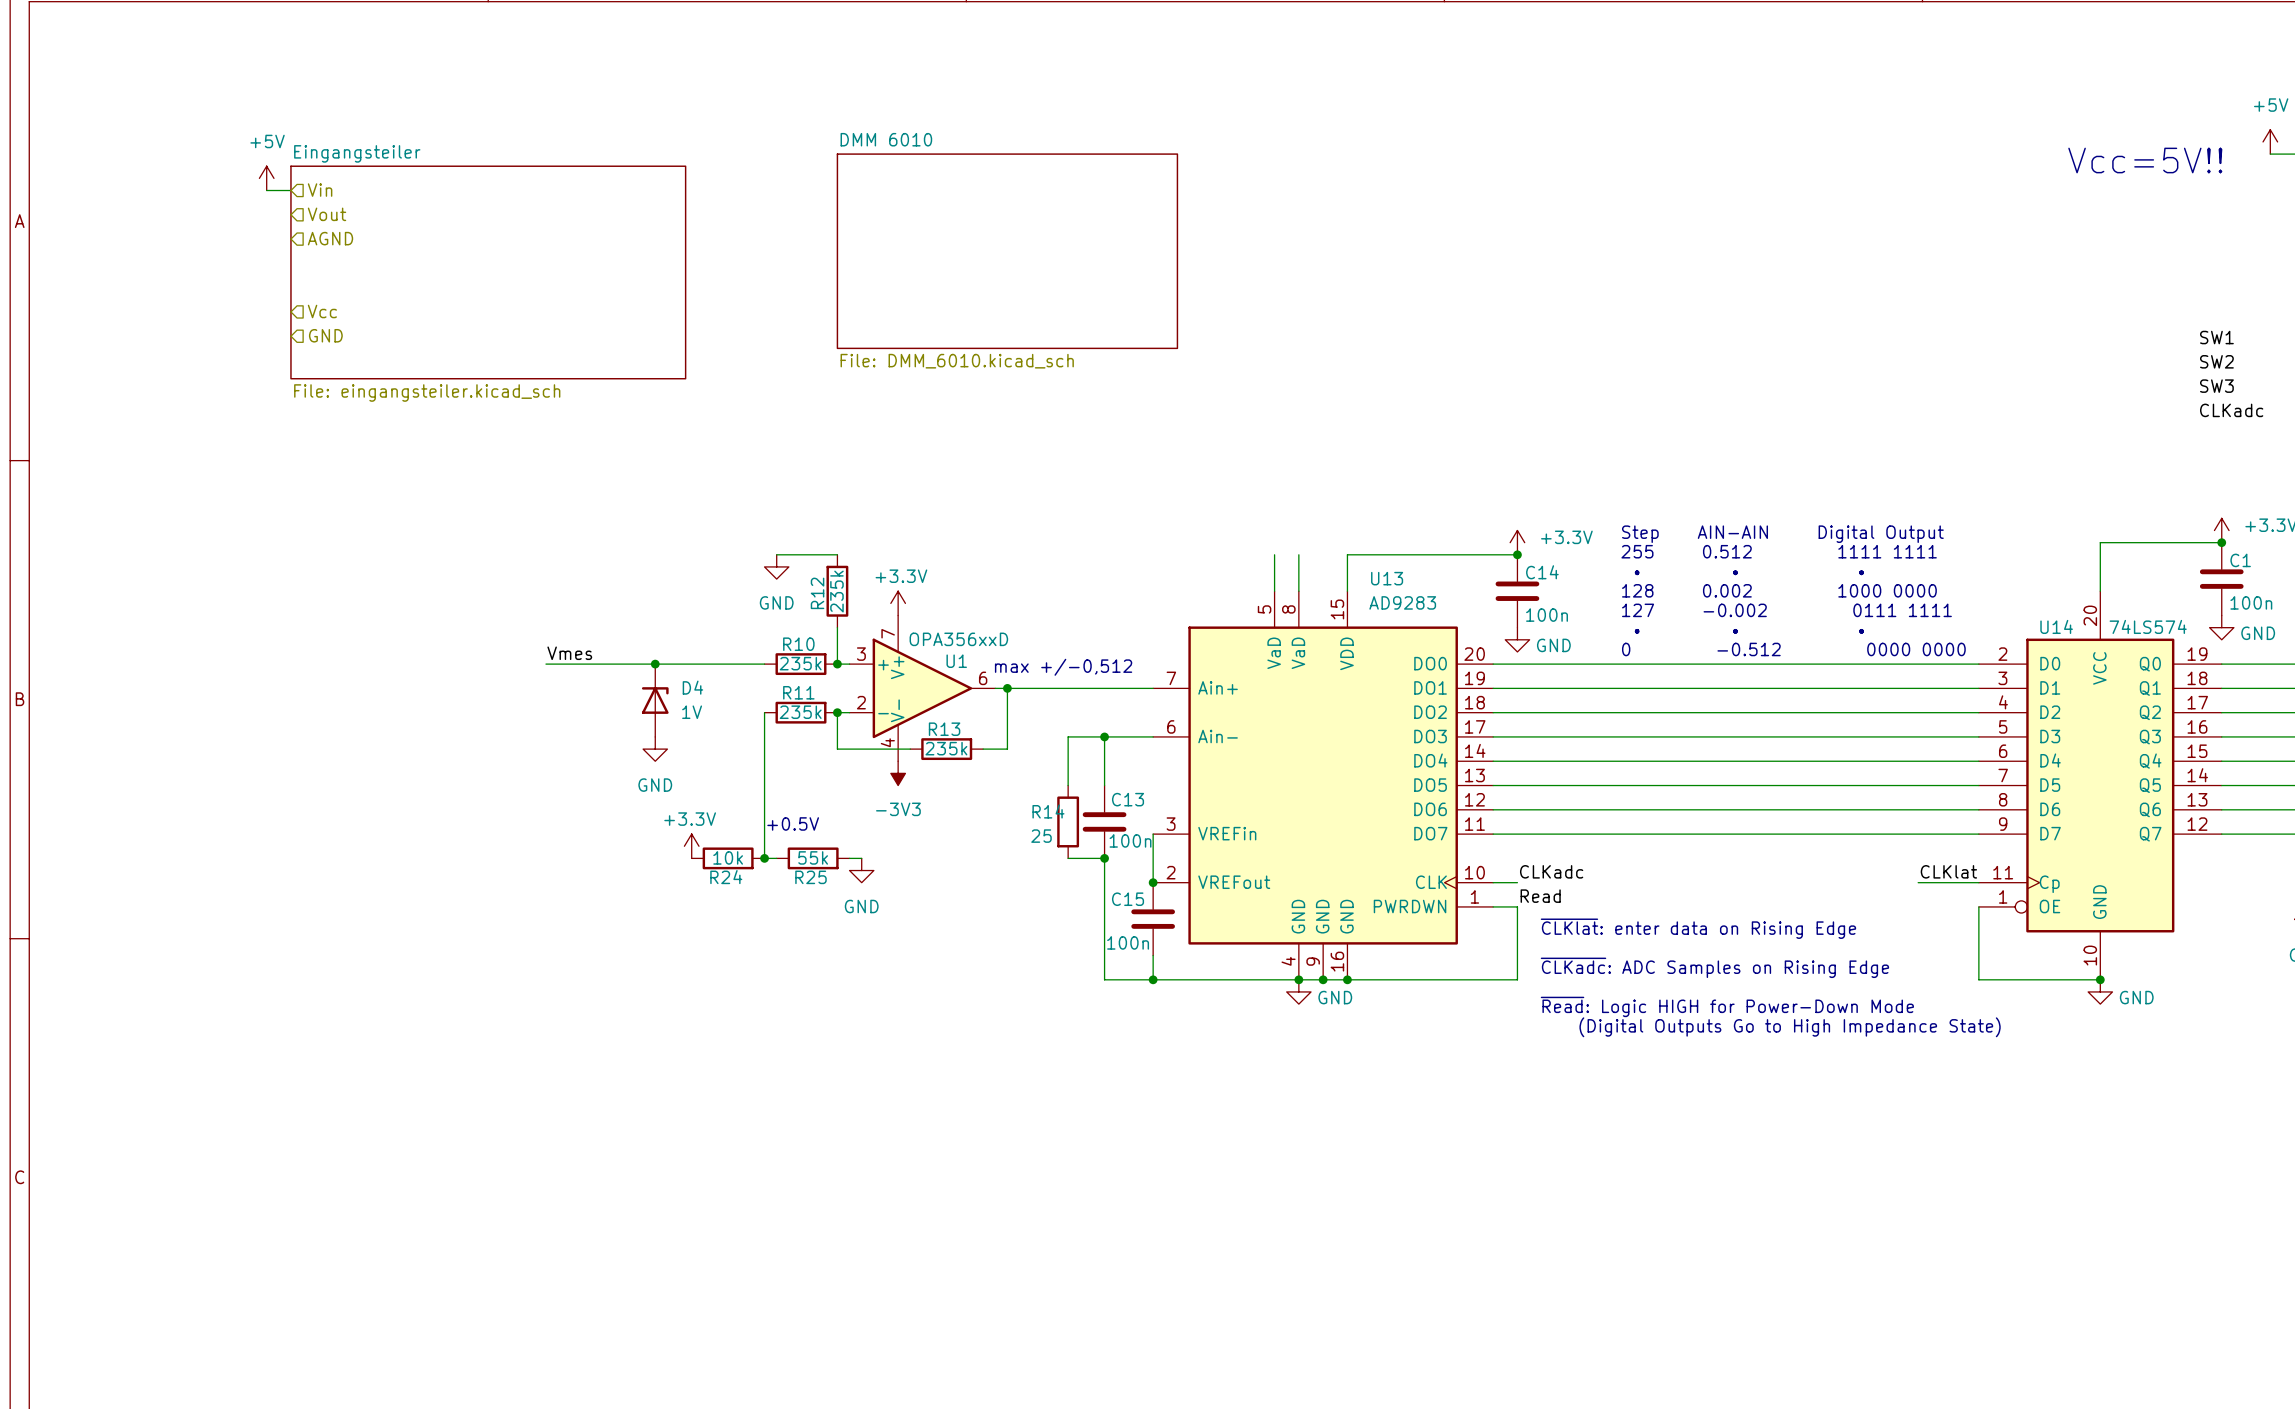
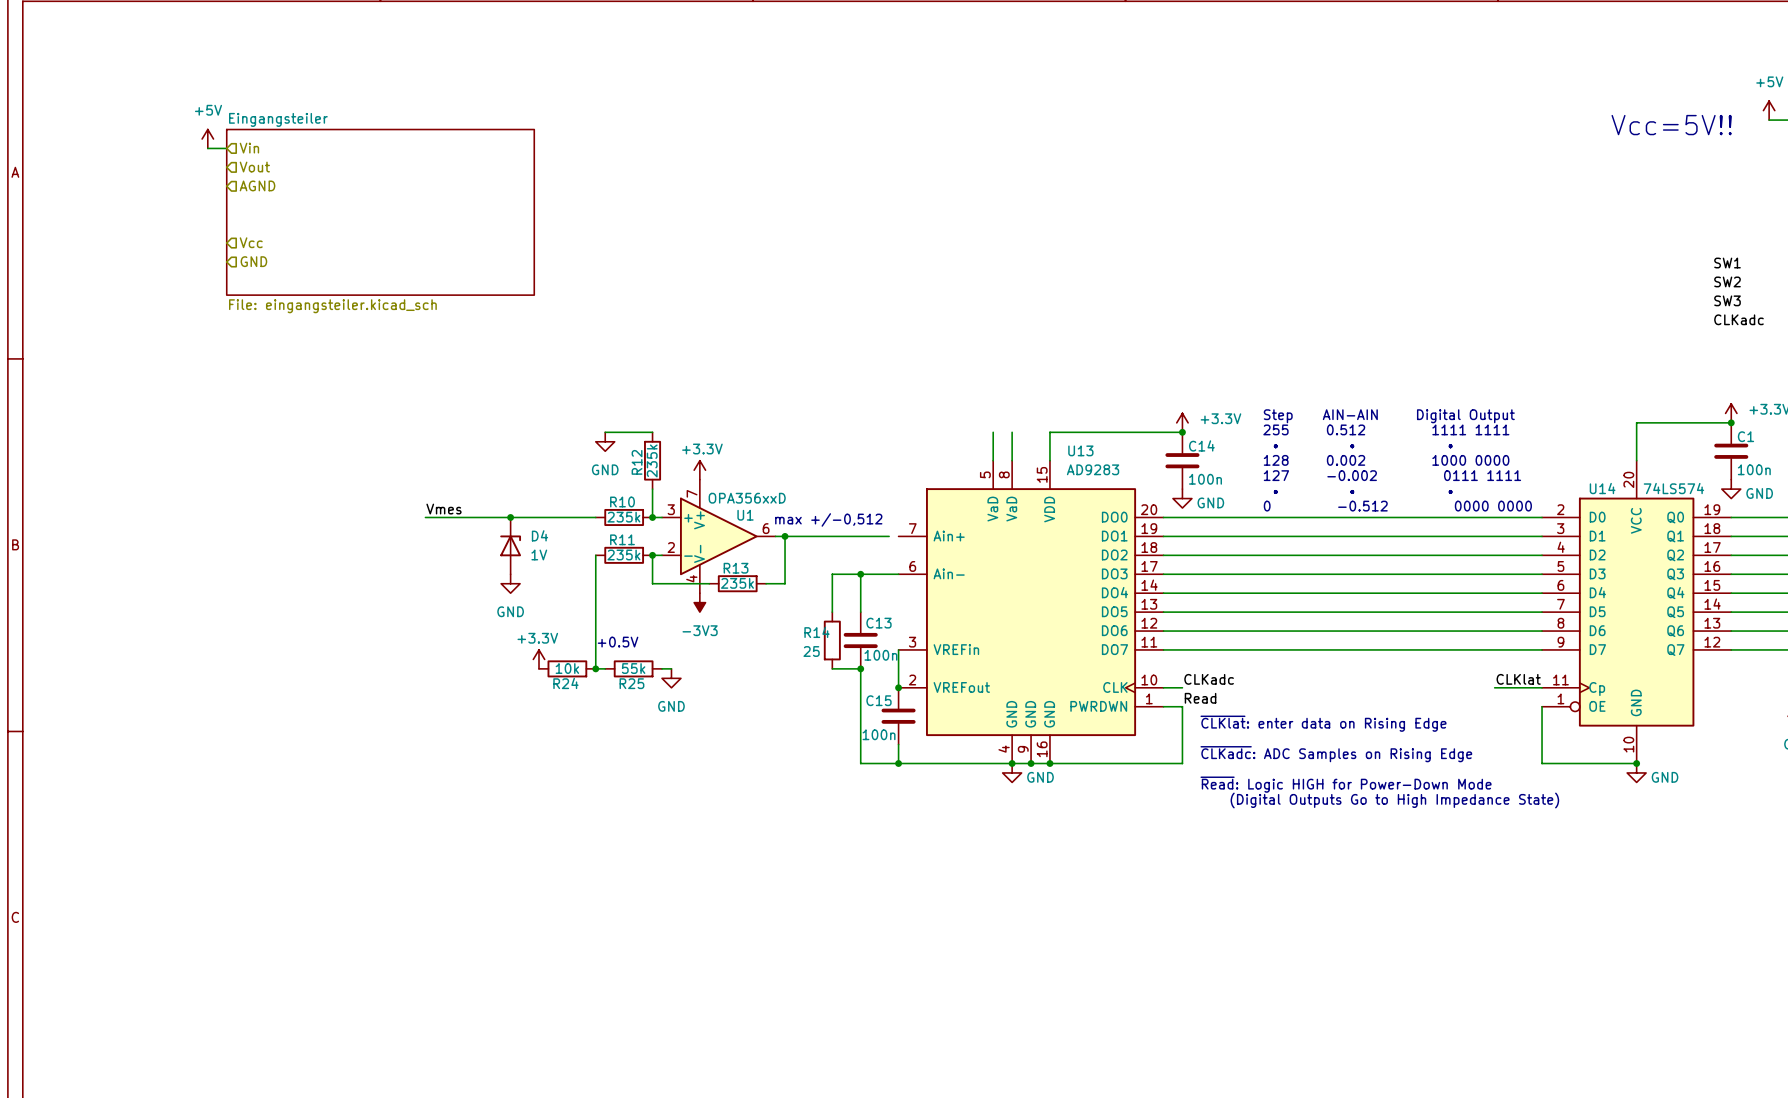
sheet DMM 6010: File: DMM_6010.kicad_sch (1007, 251) -> none
wire: (1141, 688) (1153, 688) -> none

